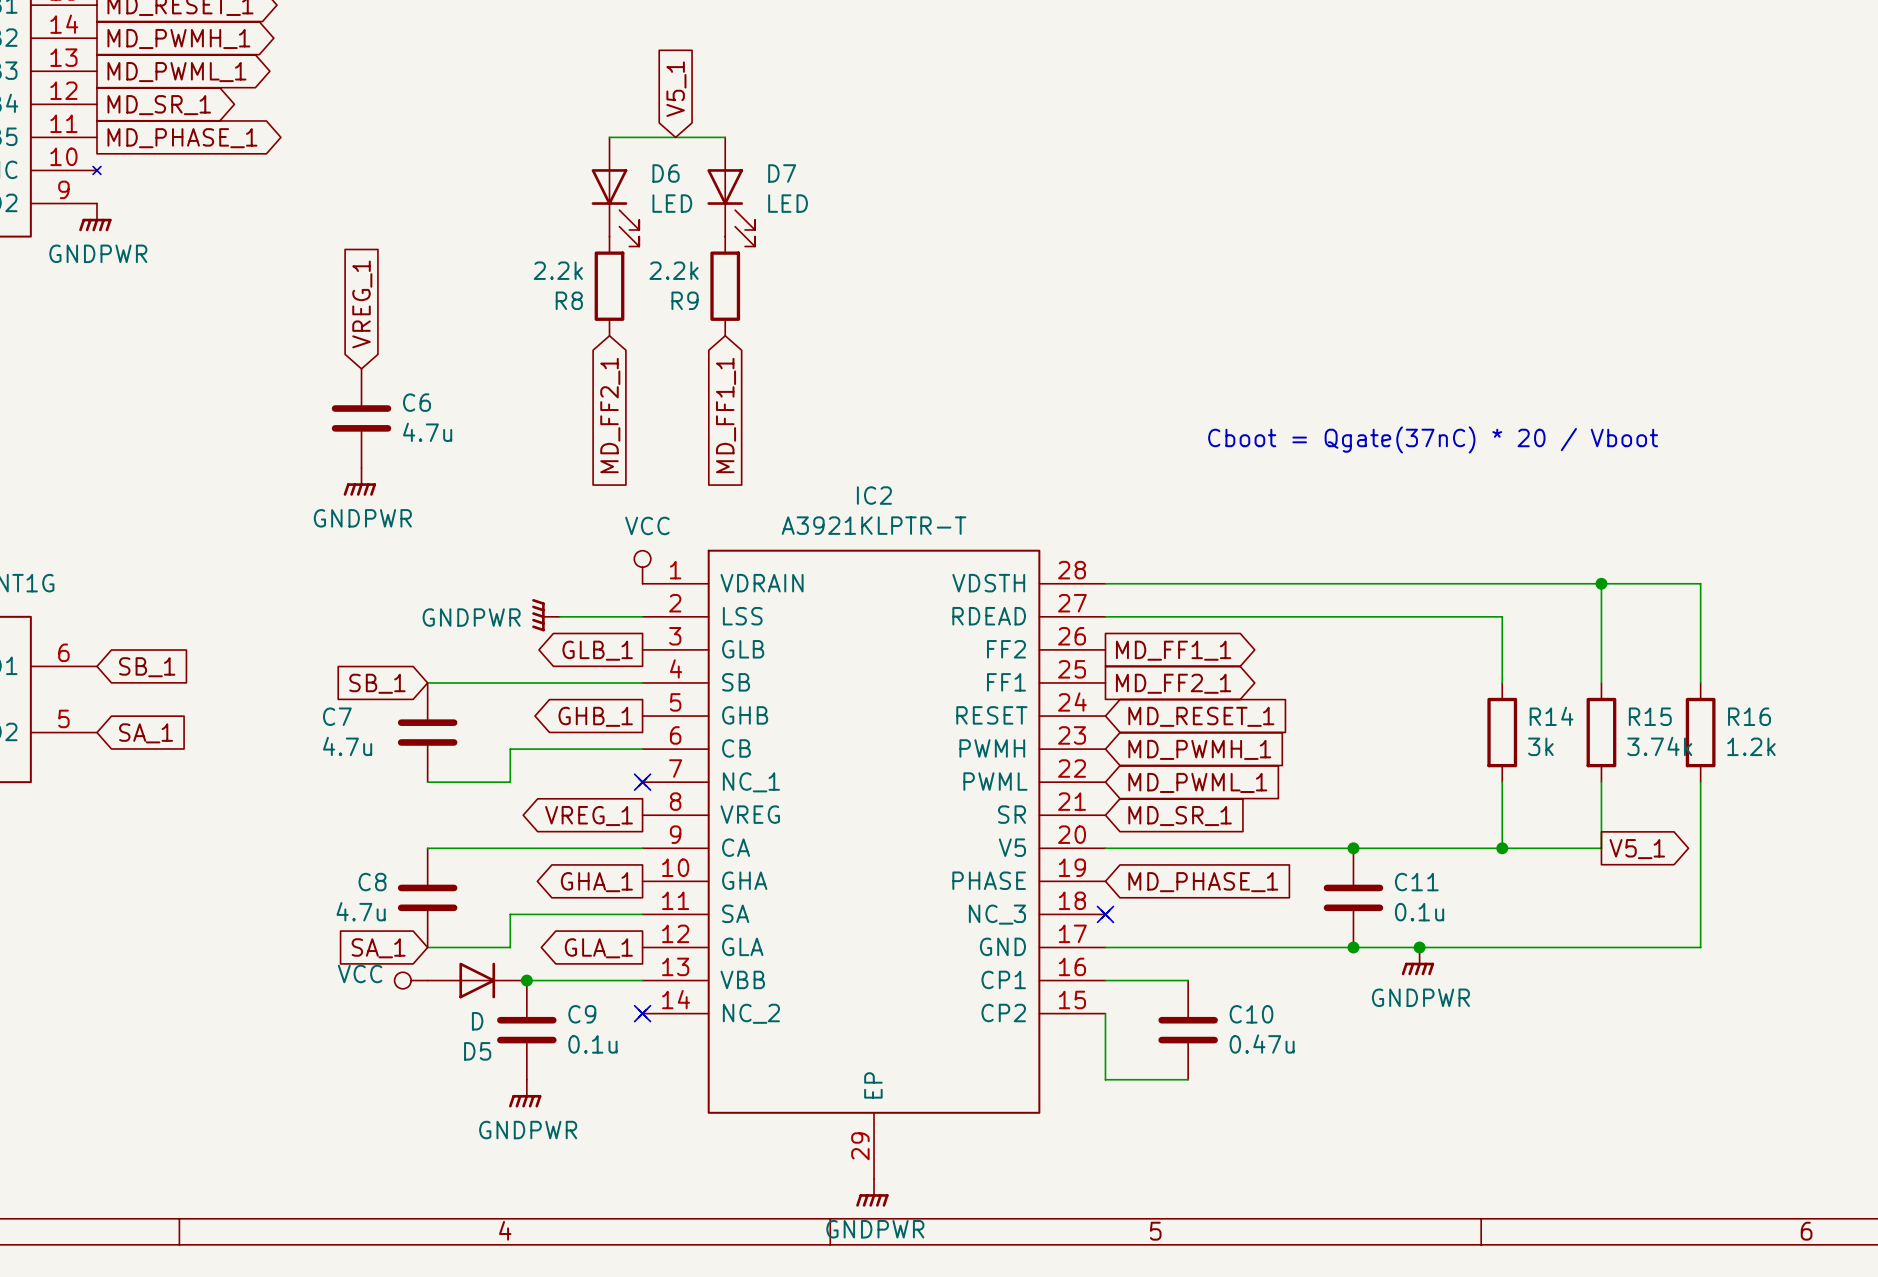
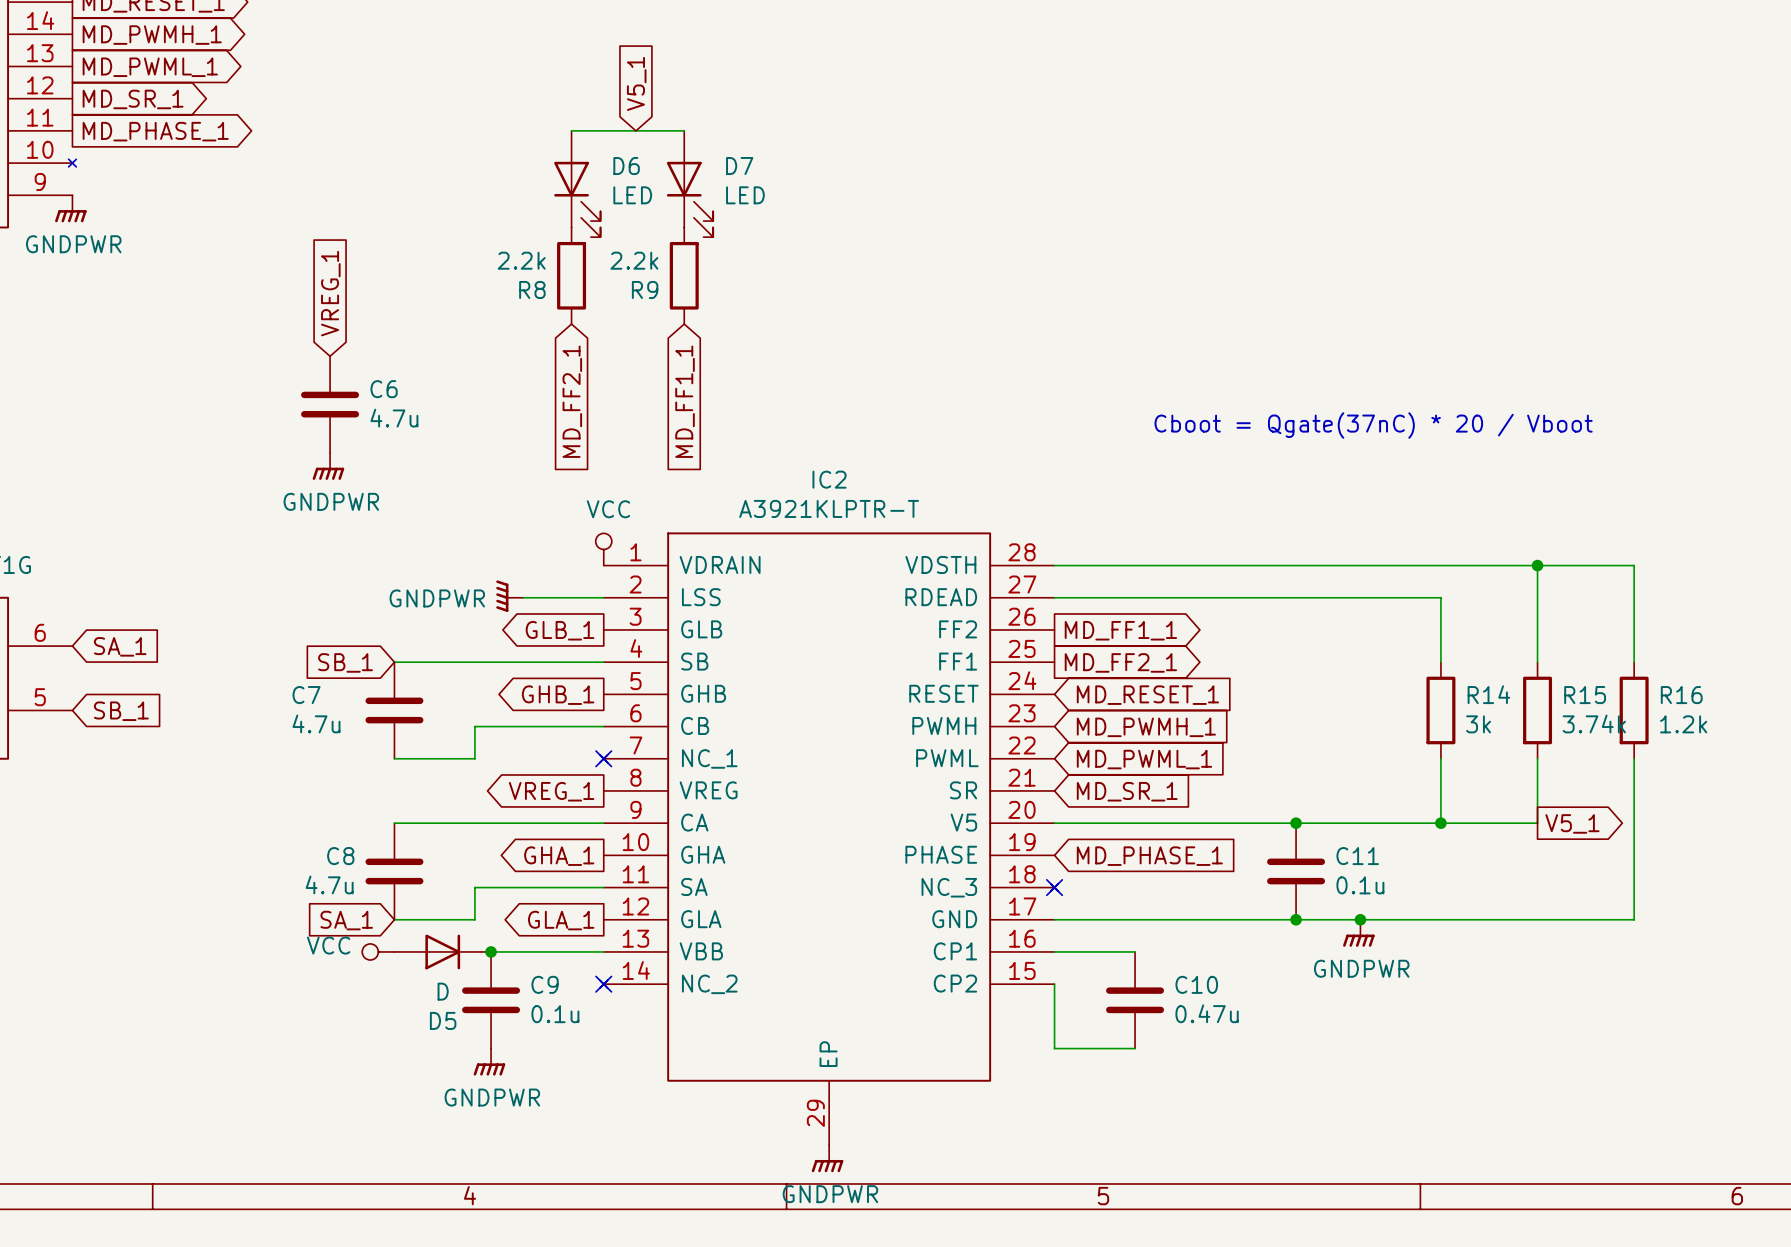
global label: SB_1 (147, 667) -> SA_1 (120, 646)
global label: SA_1 (146, 733) -> SB_1 (121, 711)

